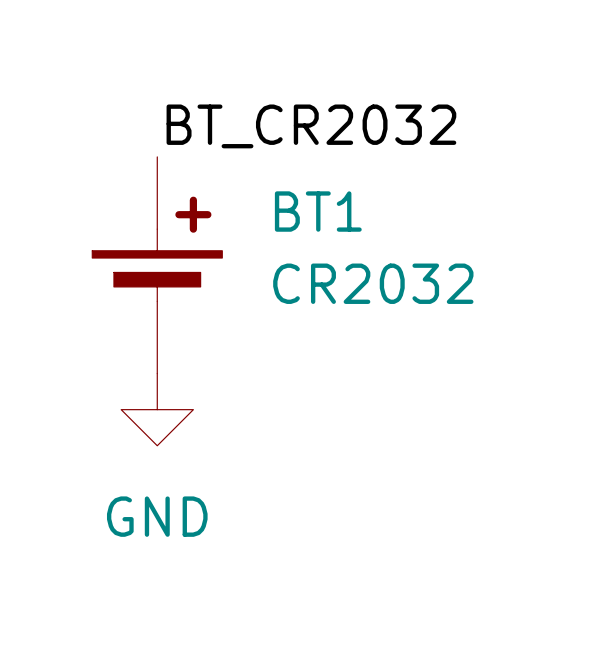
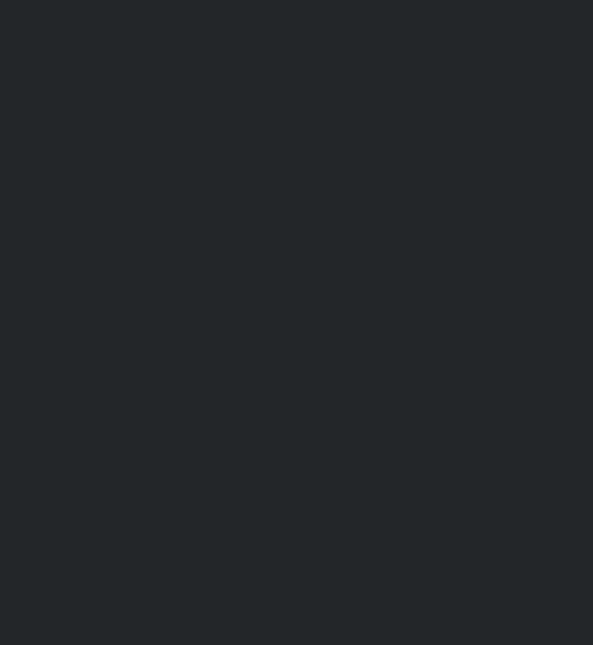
label: BT_CR2032 (311, 126) -> none
BT1: CR2032 (157, 265) -> none
power symbol: GND (157, 409) -> none

